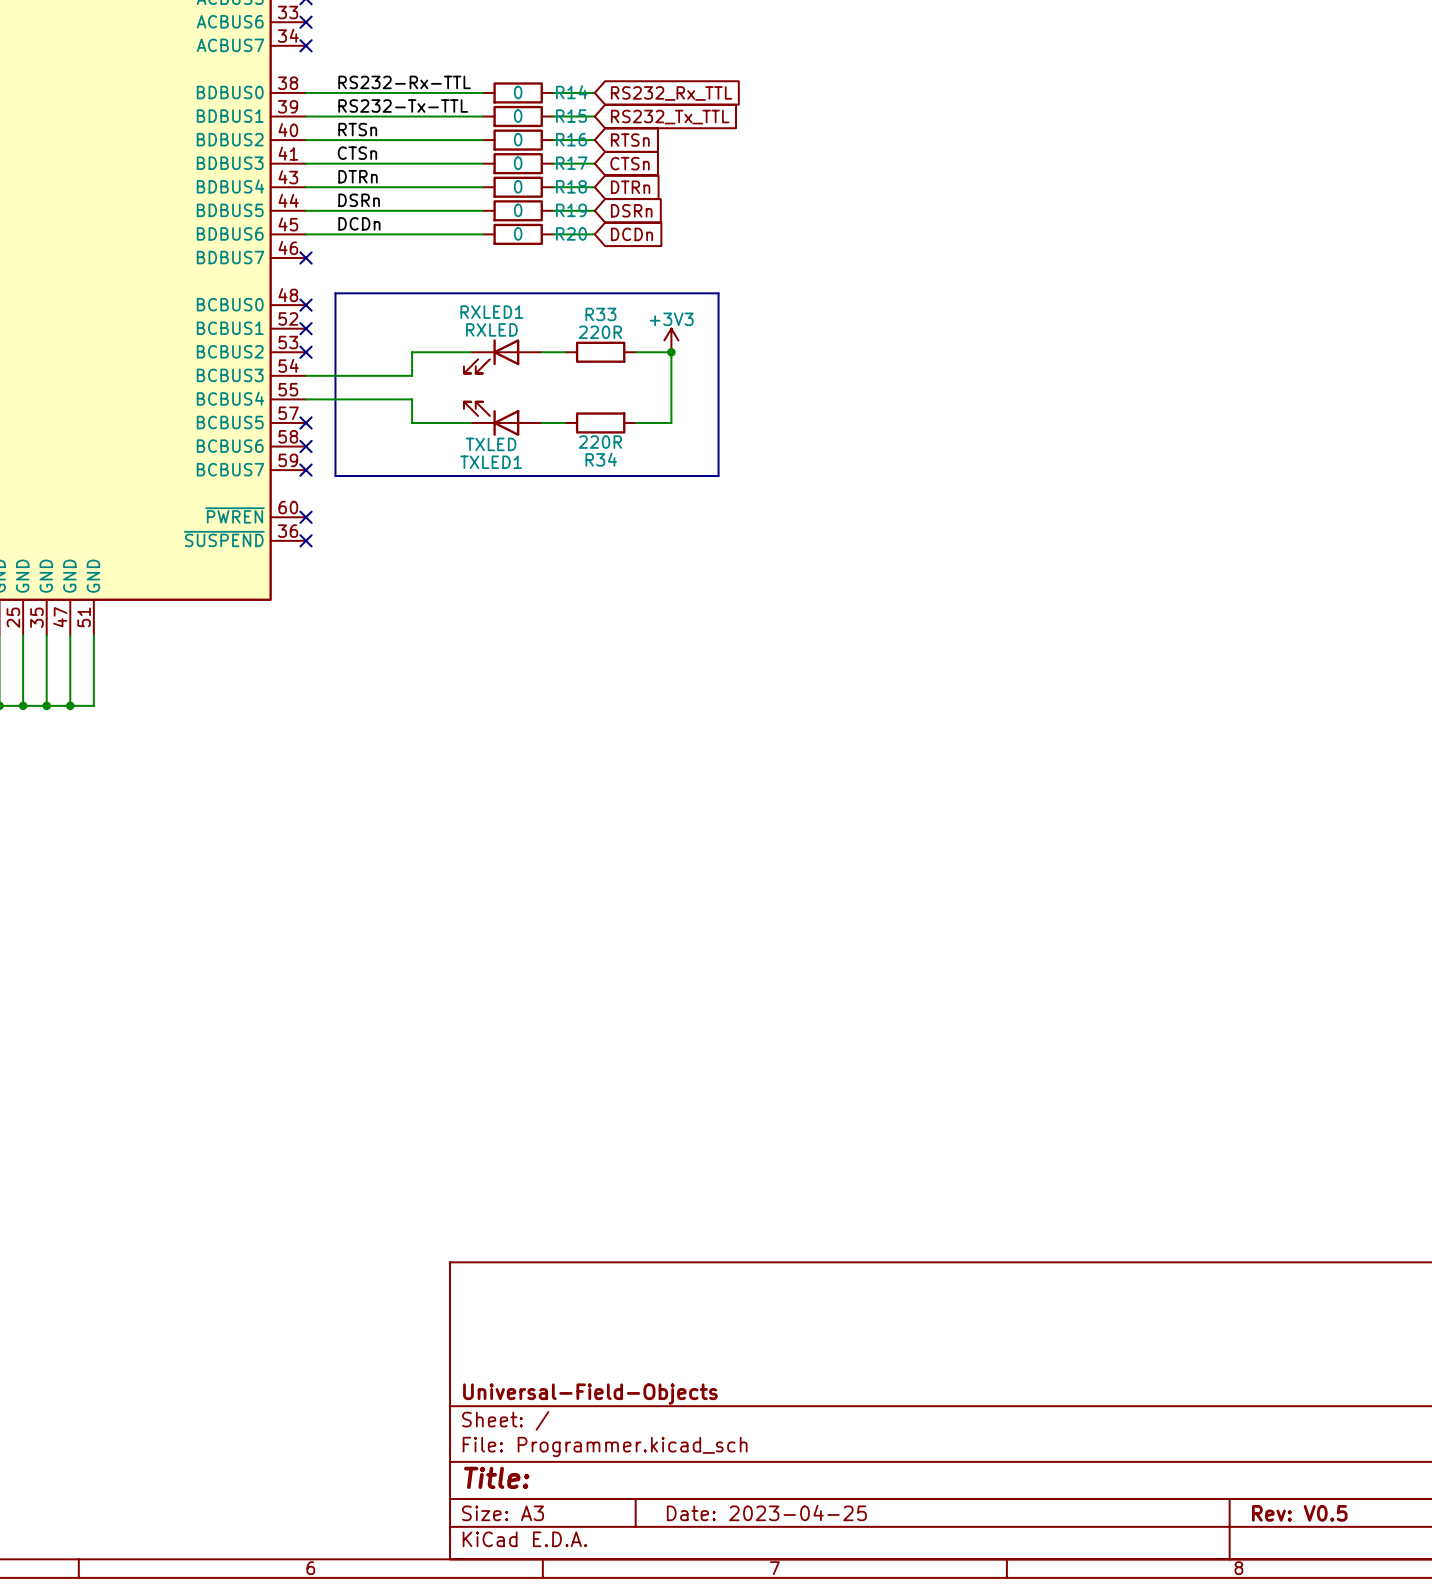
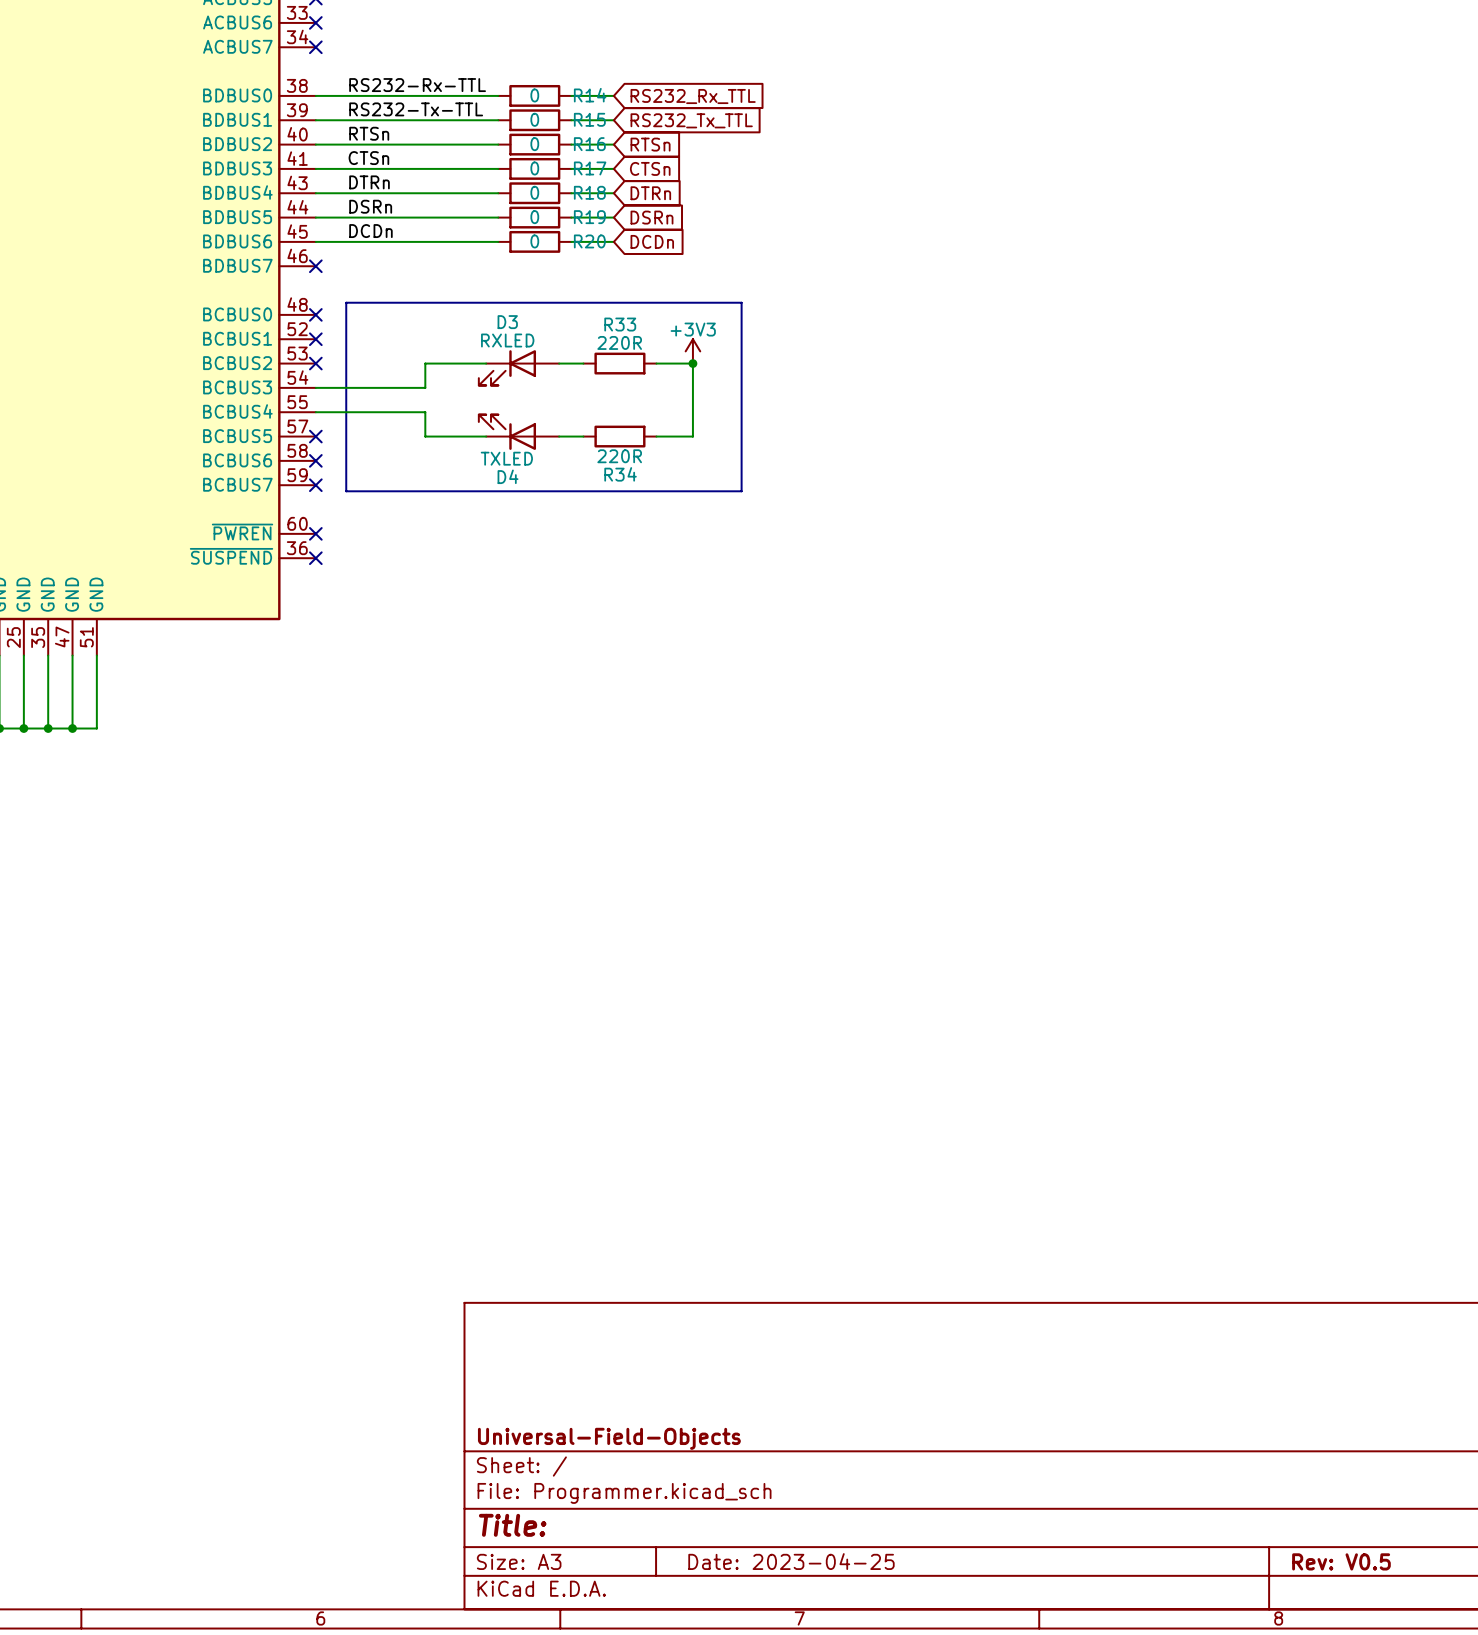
RXLED1 name: RXLED1 (491, 312) -> D3 (507, 322)
TXLED1 name: TXLED1 (491, 462) -> D4 (508, 476)

